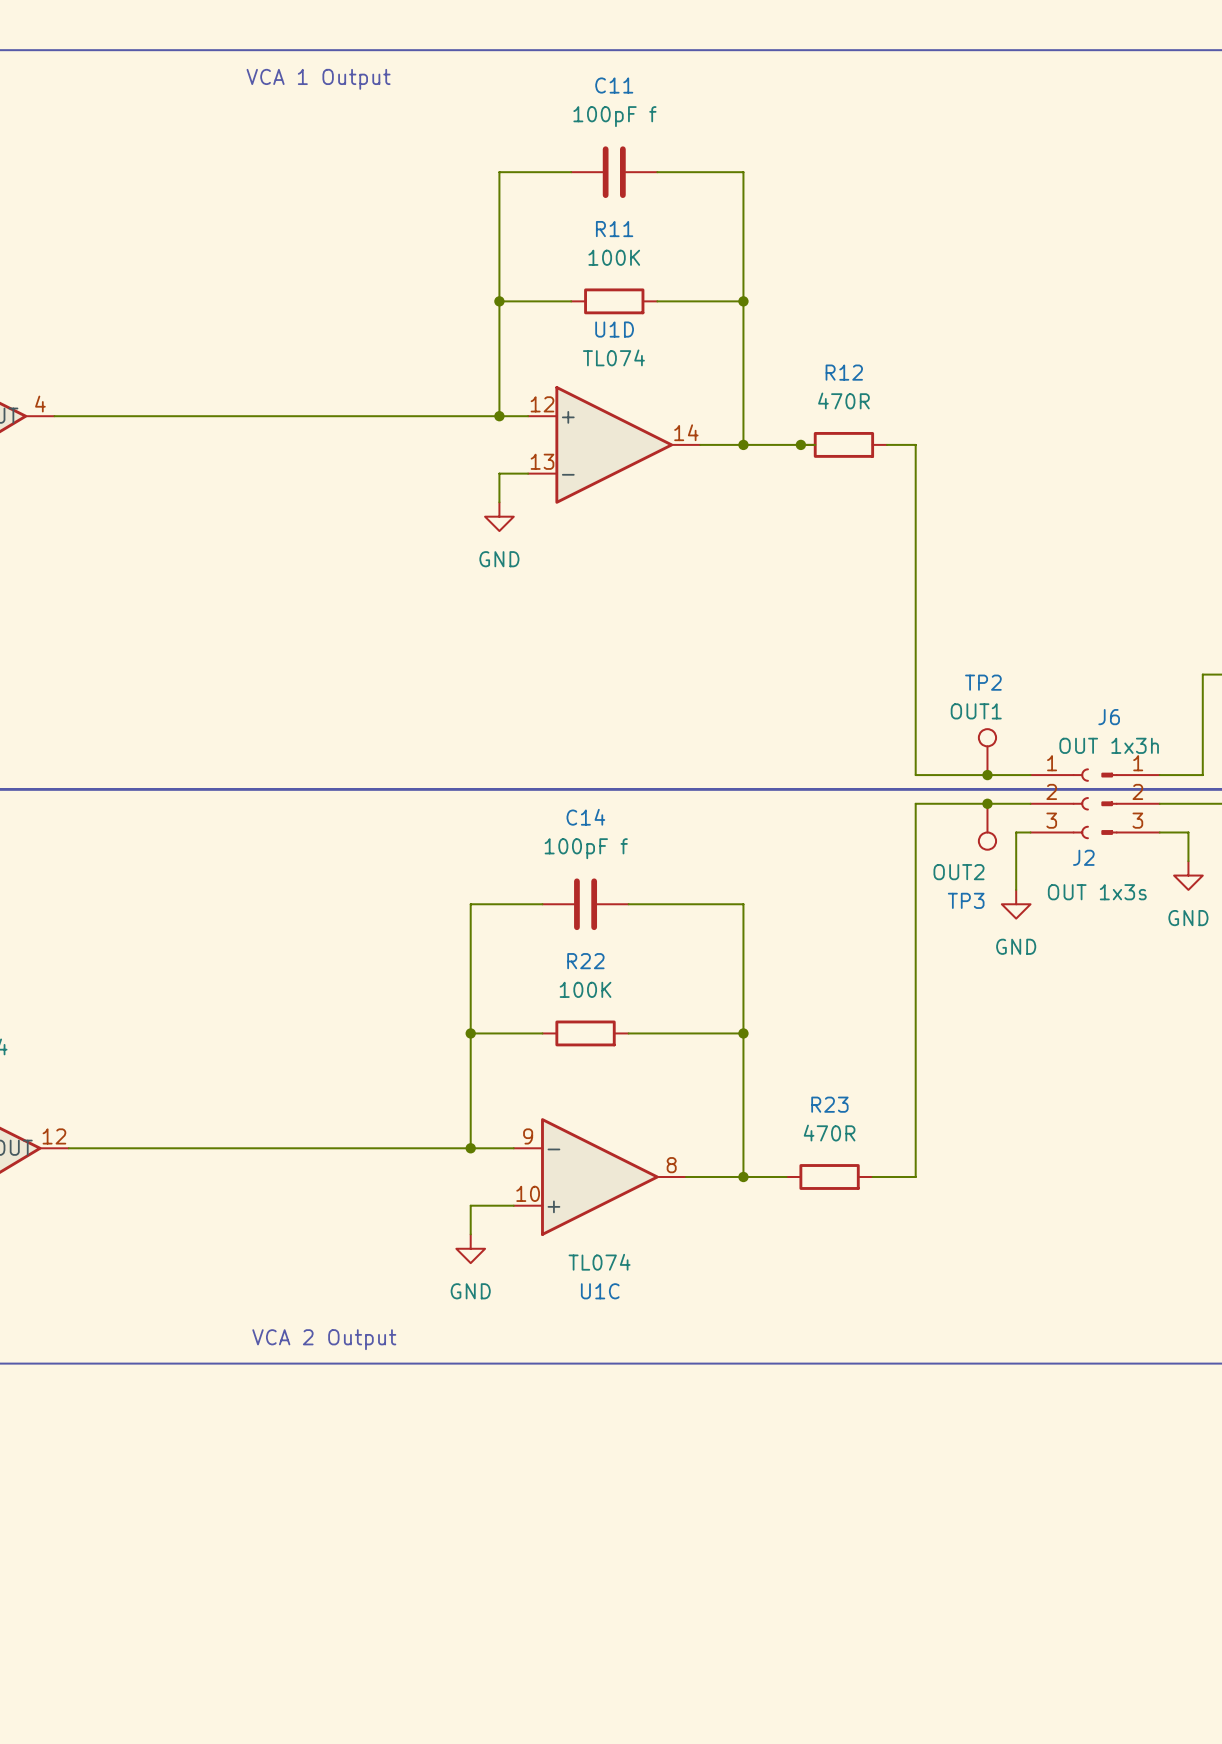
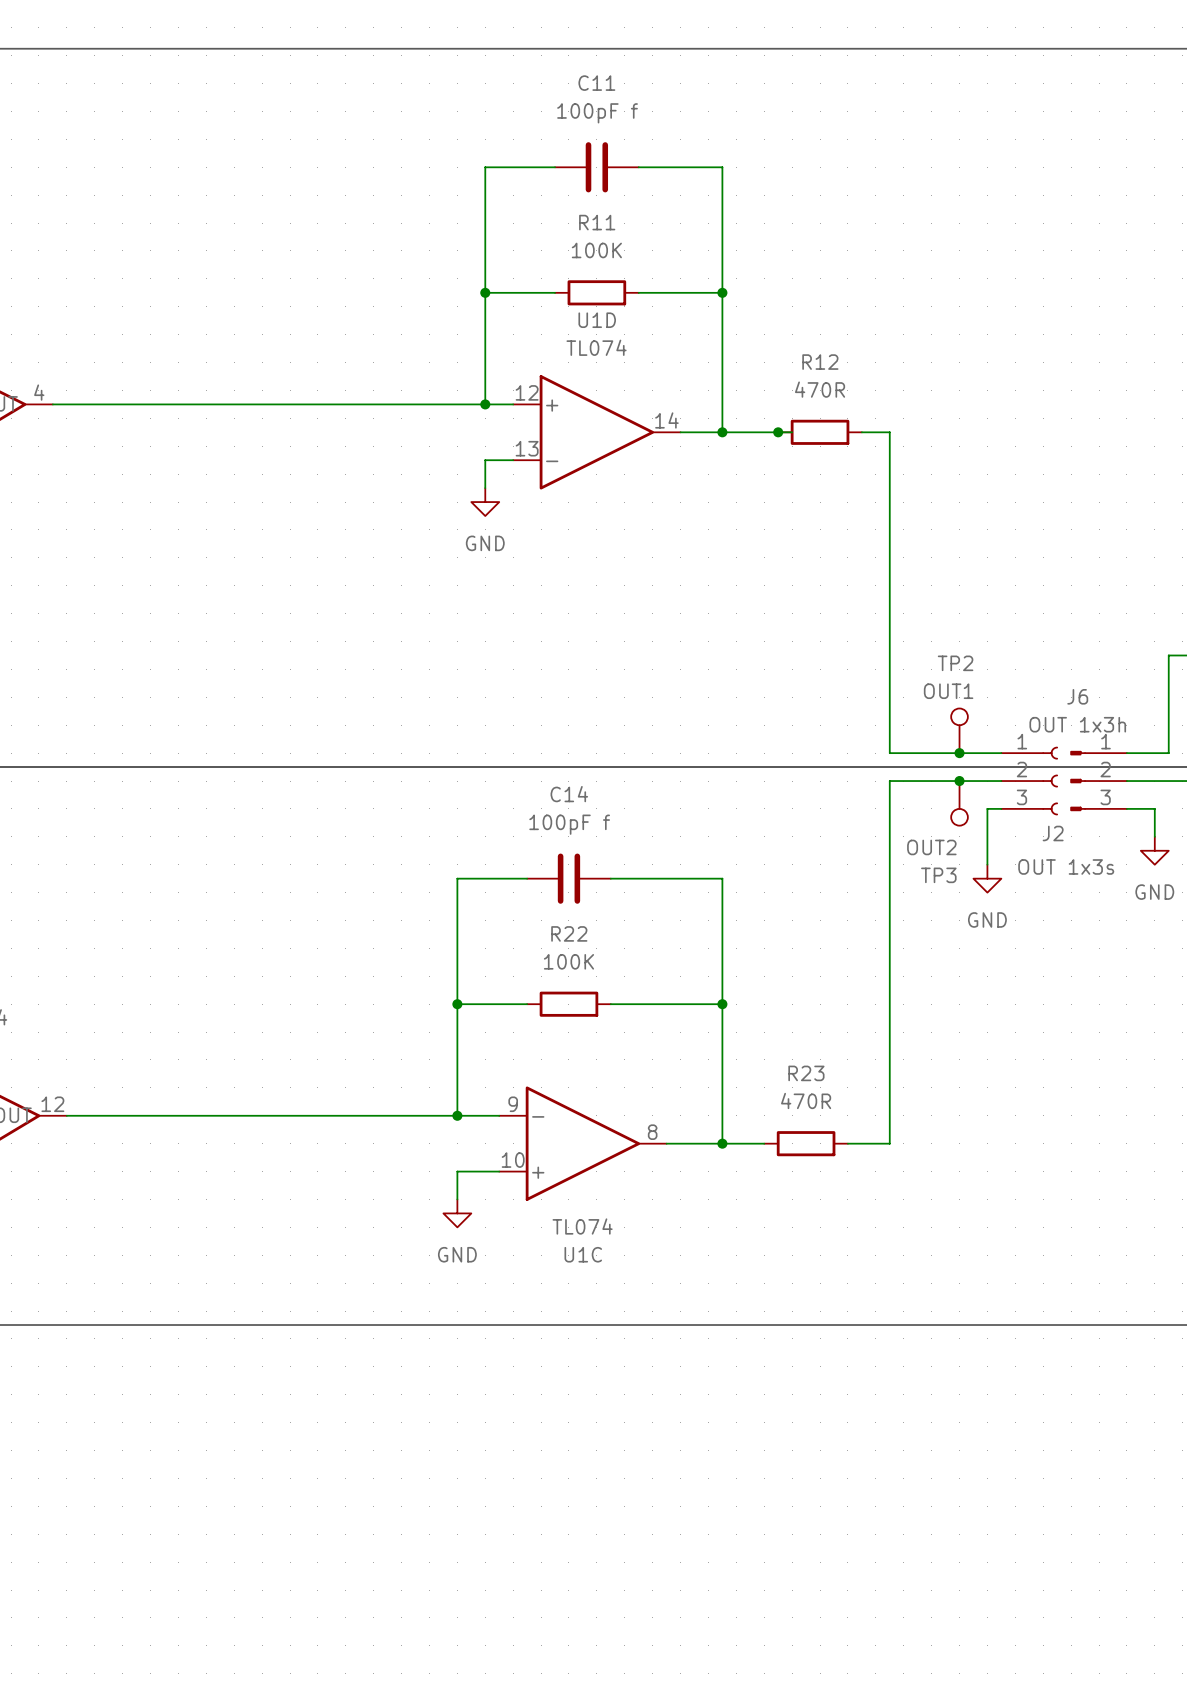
text: VCA 1 Output (318, 79) -> none
text: VCA 2 Output (324, 1339) -> none

